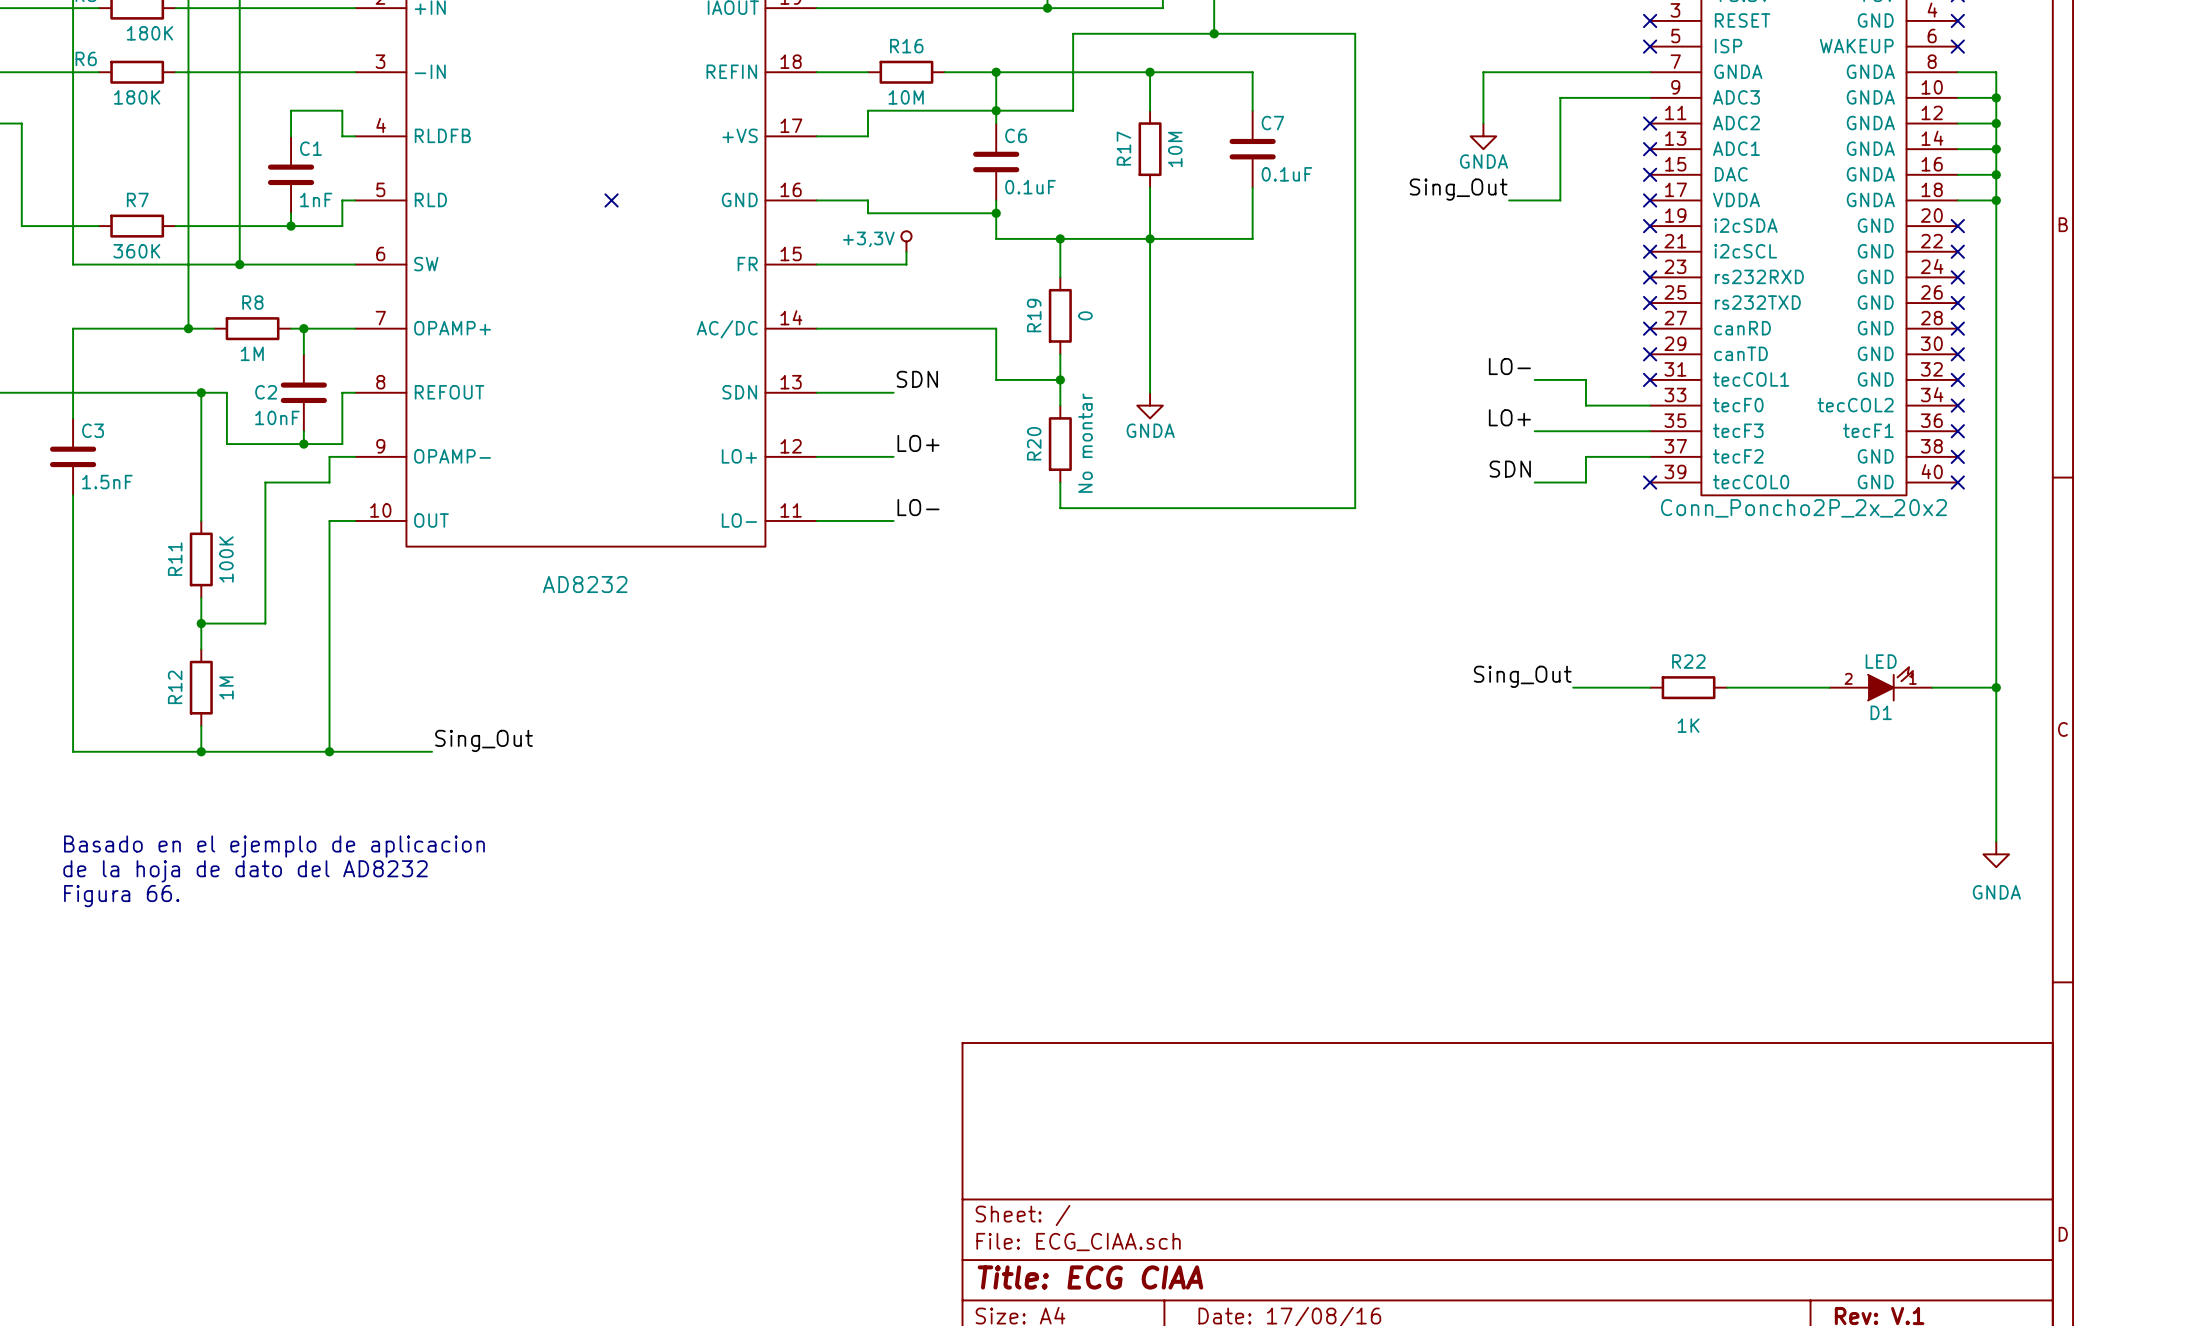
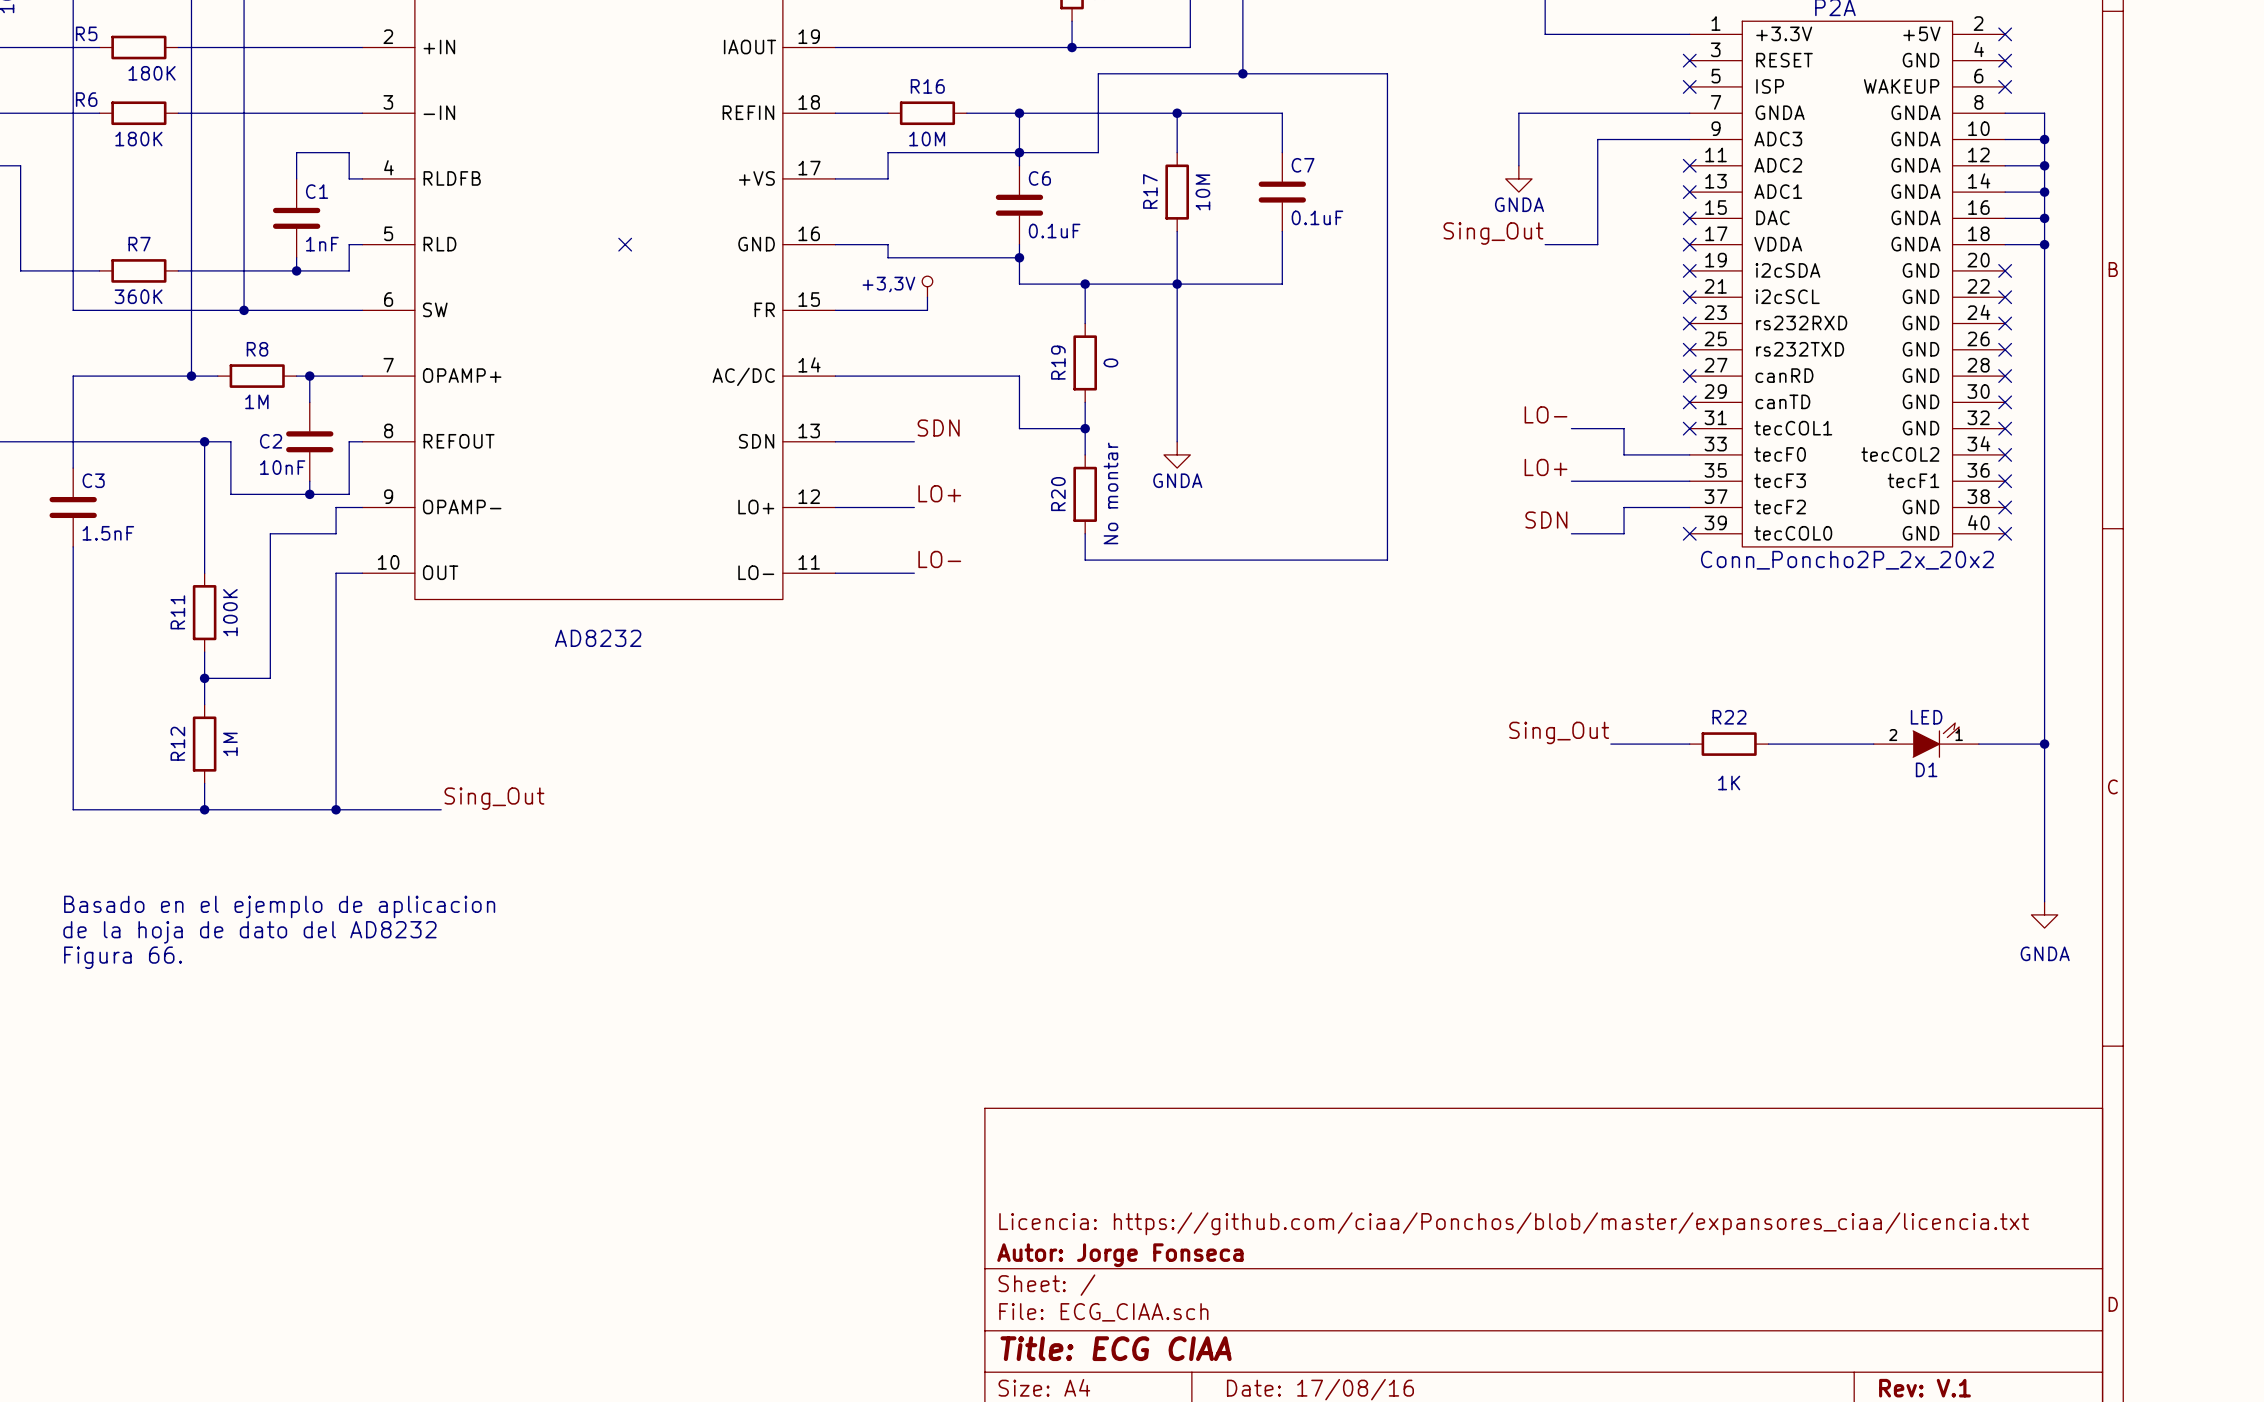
title block: none -> Licencia: https://github.com/ciaa/Ponchos/blob/master/expansores_ciaa/licencia.txt (1514, 1223)
title block: none -> Autor: Jorge Fonseca (1120, 1255)

